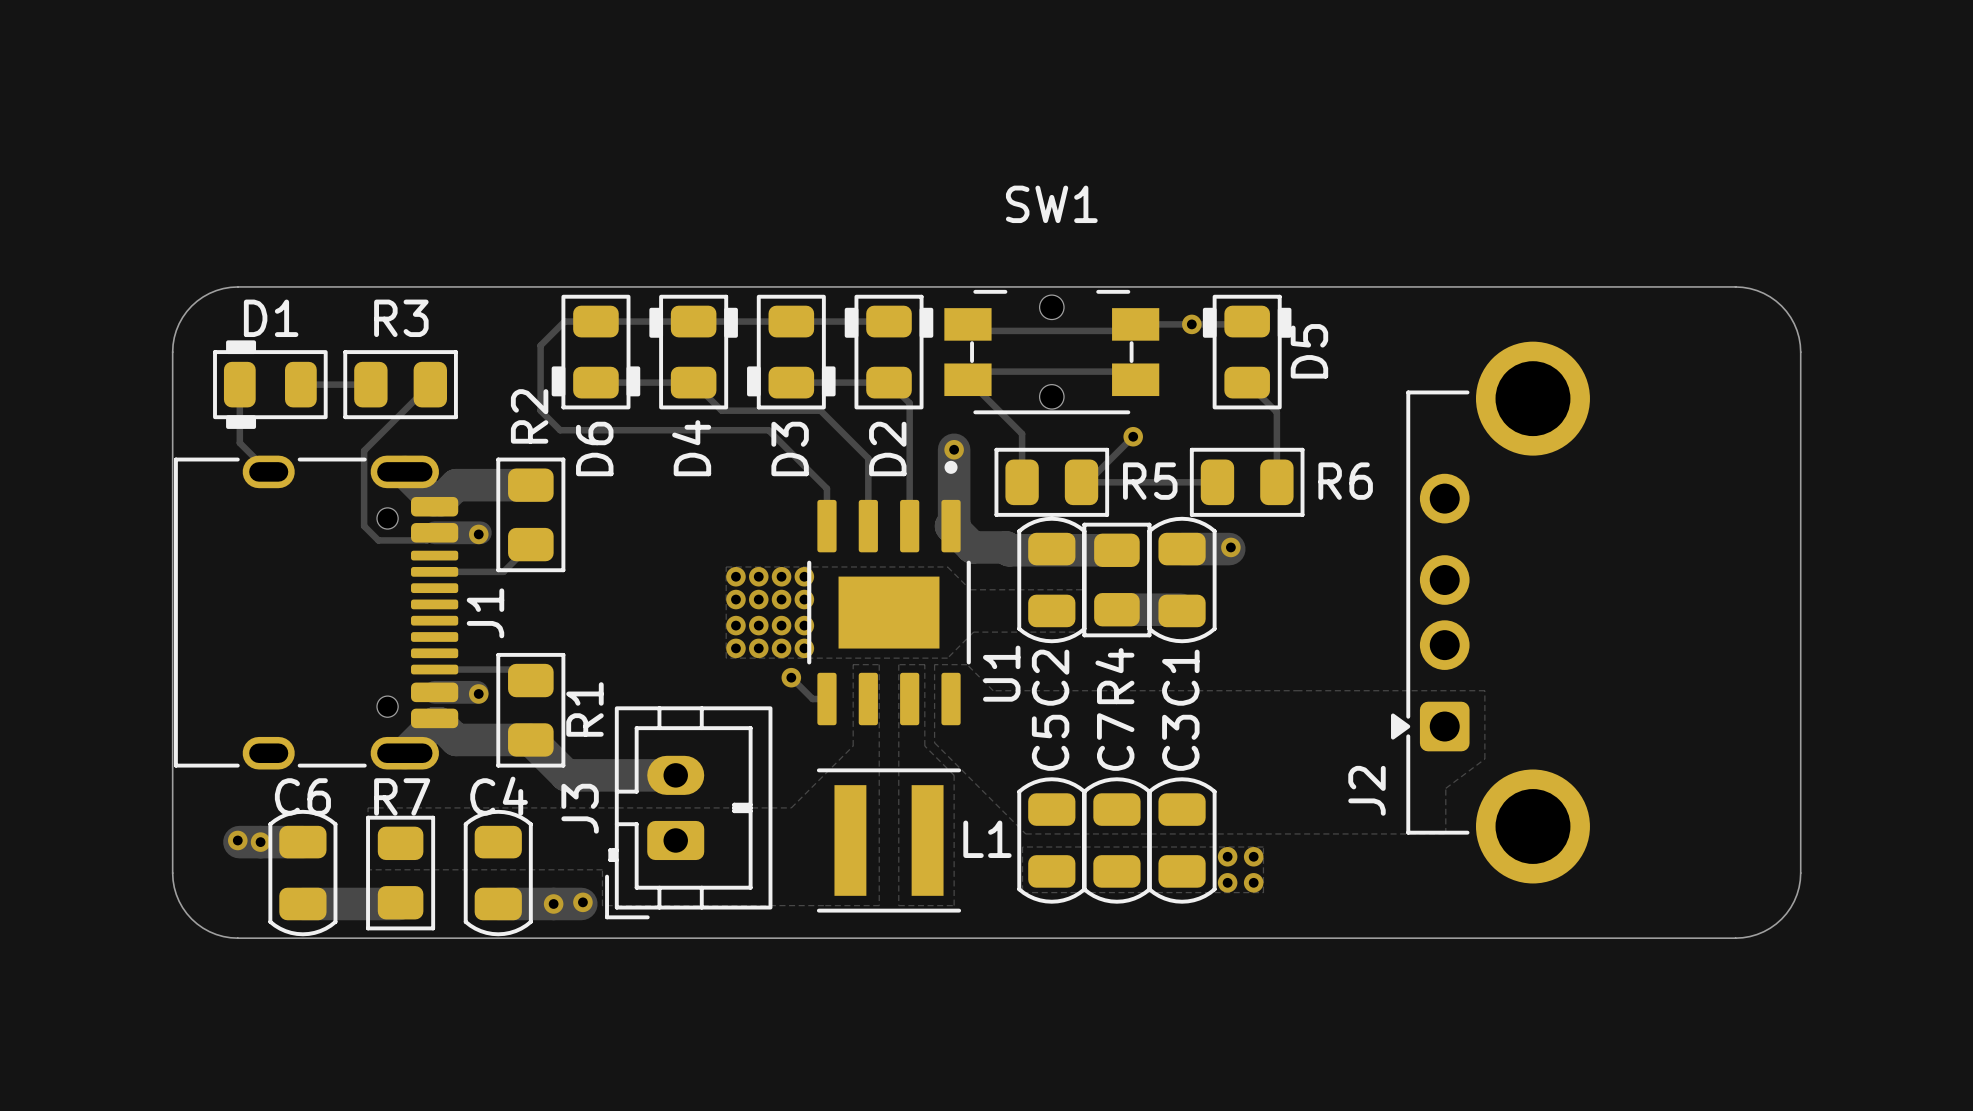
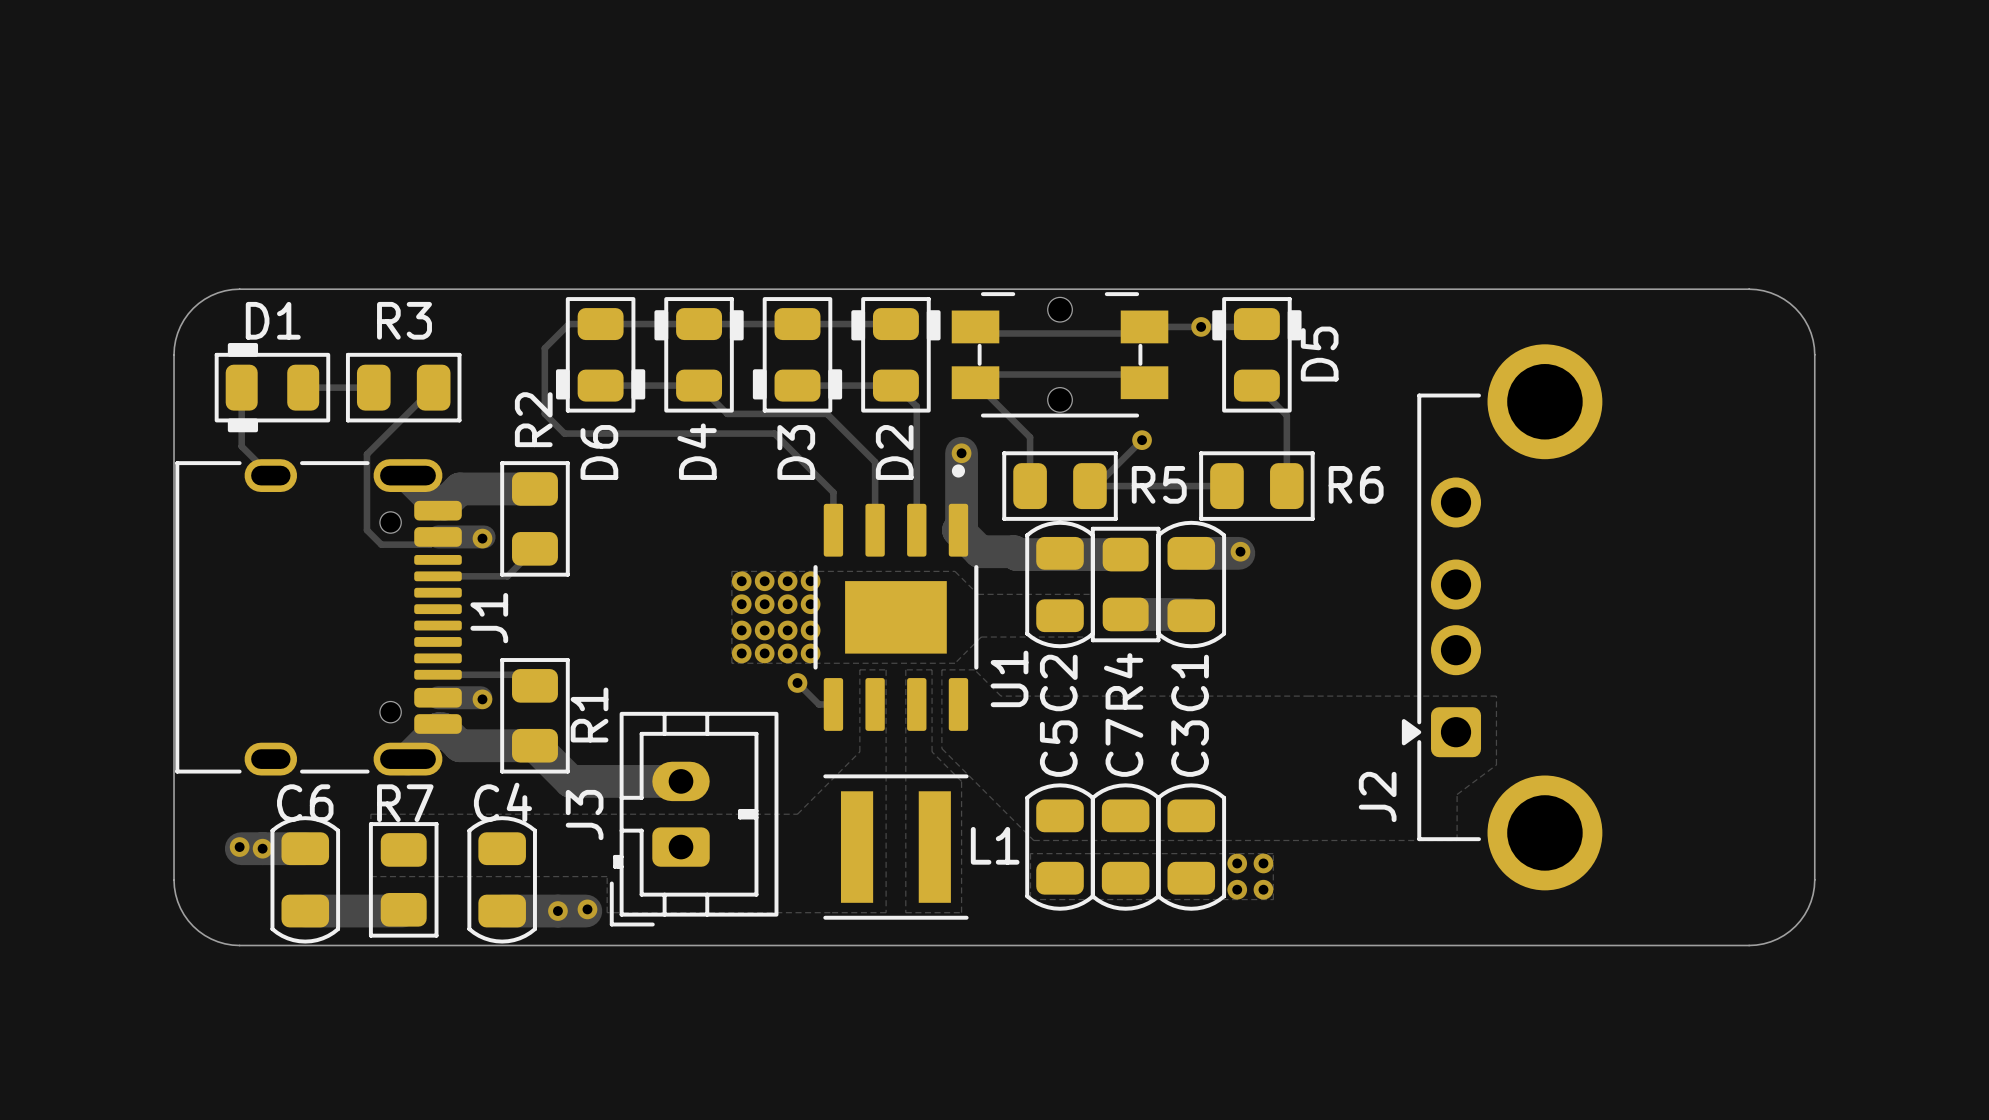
SW1 name: SW1 (1051, 204) -> none

